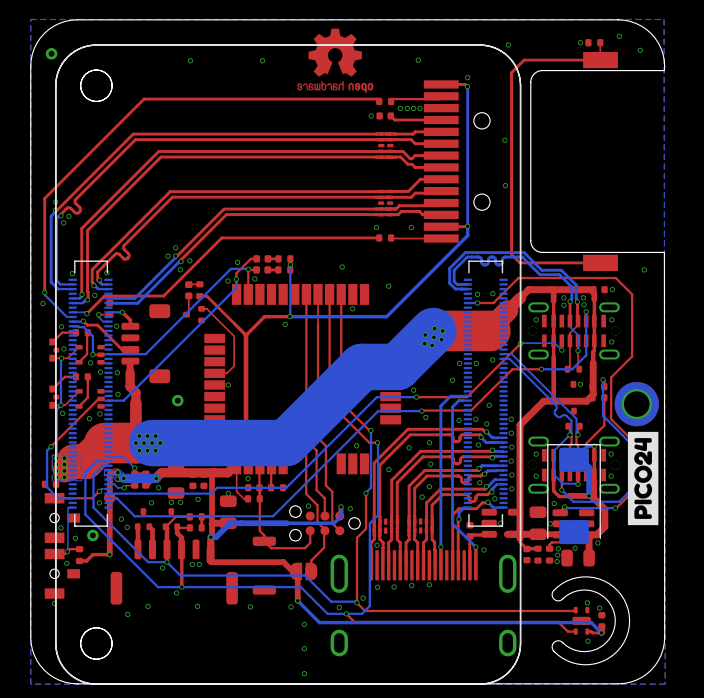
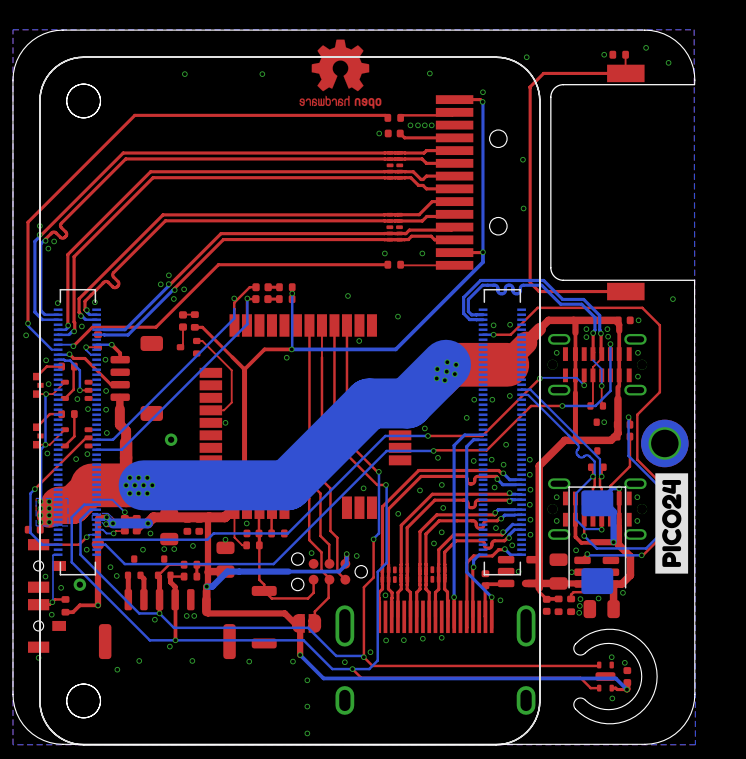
part: (51, 53) -> none
via: (237, 262) -> none
via: none -> (234, 298)
bottom track: (248, 269) (230, 268) (145, 354) (108, 354) -> (247, 298) (247, 324) (121, 449) (96, 449)
via: (254, 278) -> none
via: (236, 279) -> none
via: (227, 280) -> none
via: none -> (106, 390)

